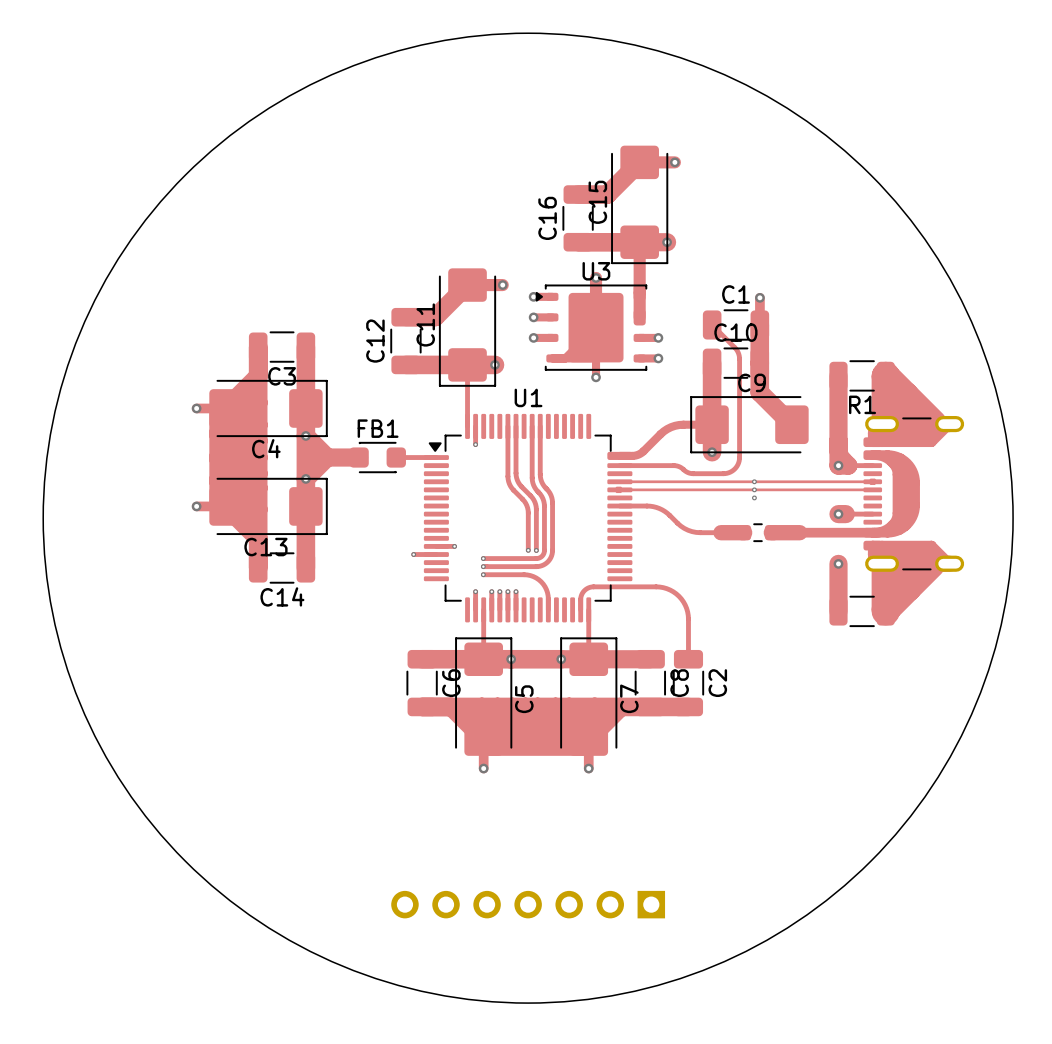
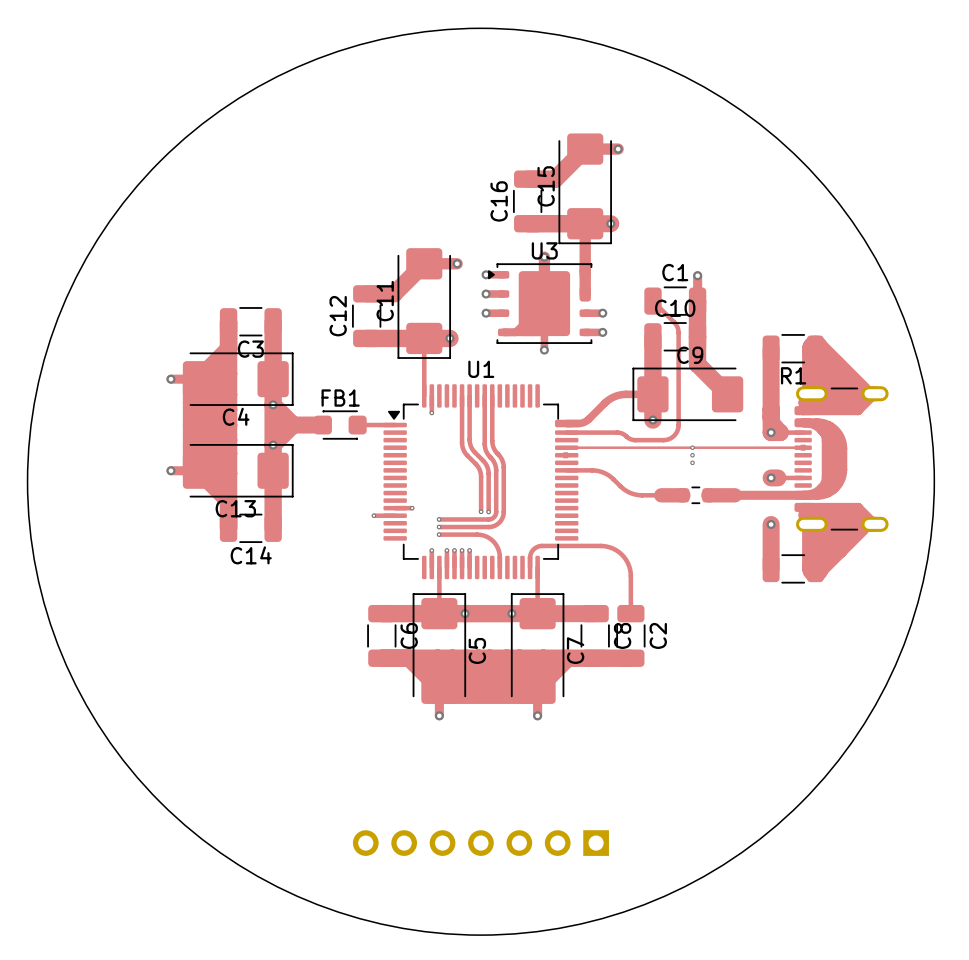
track: (619, 489) (872, 489) -> none

